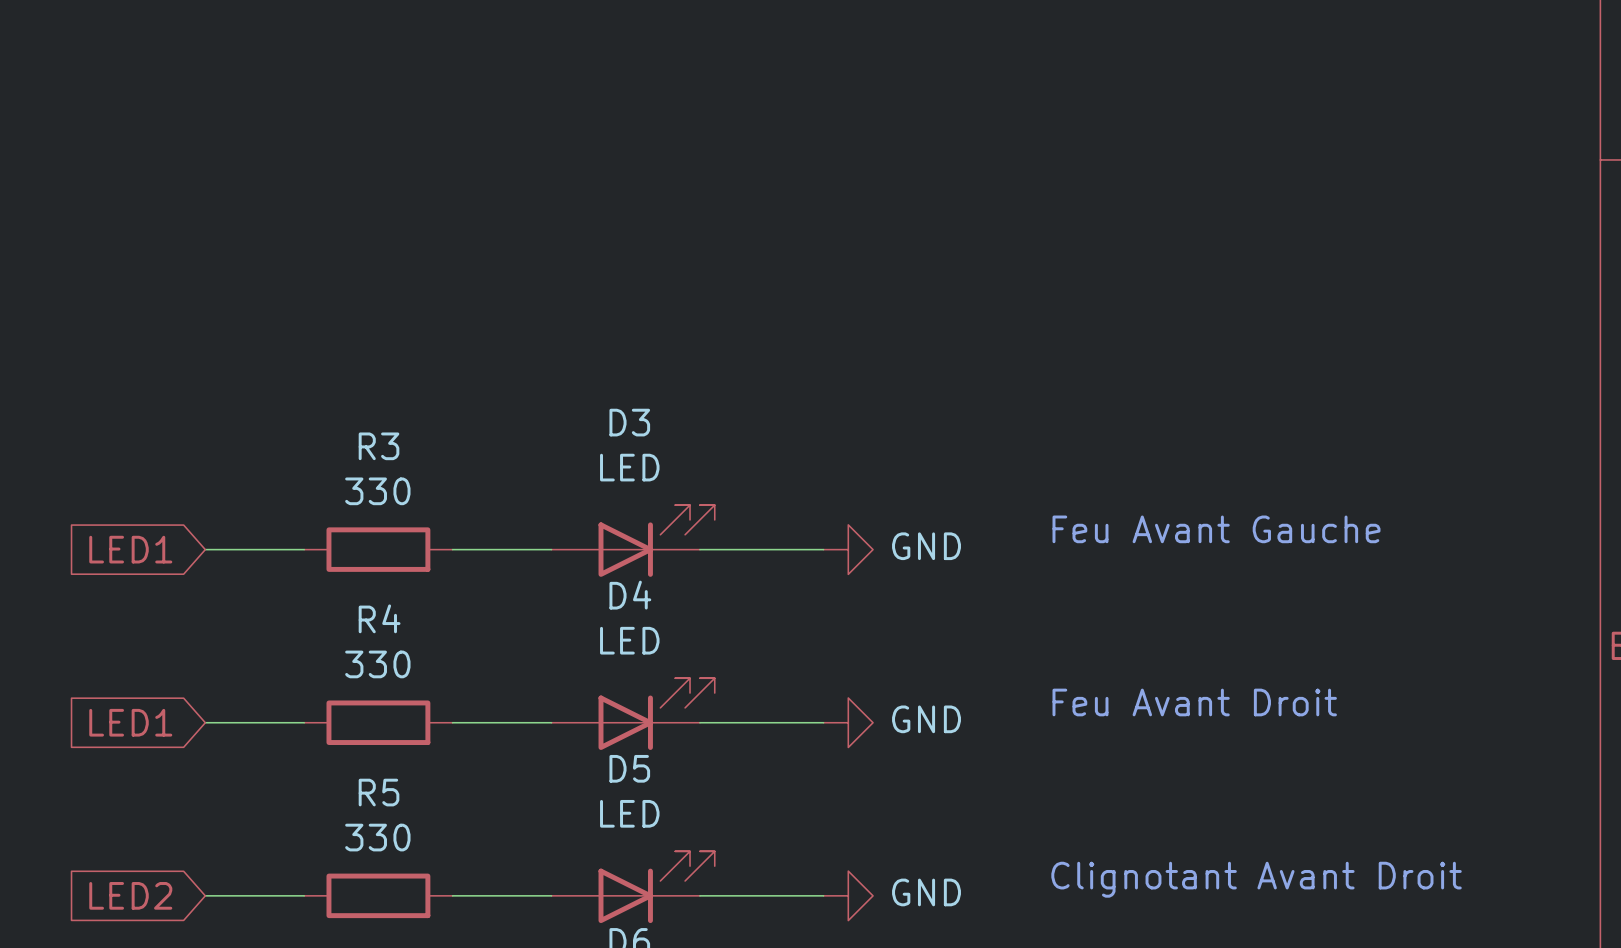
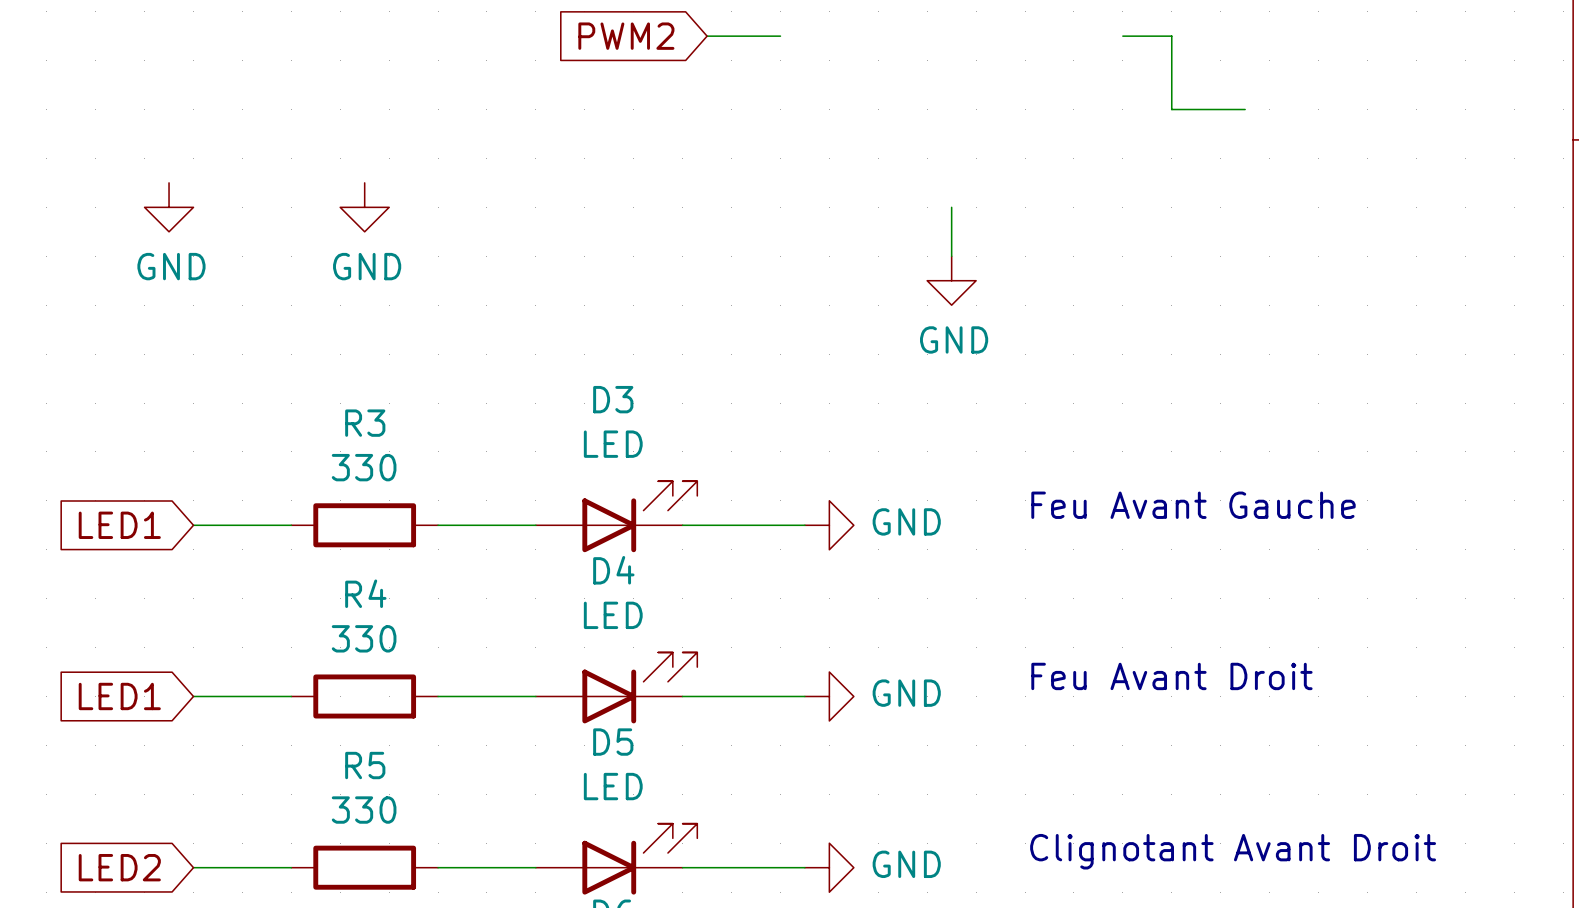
global label: none -> PWM2 (626, 36)
wire: none -> (707, 36) (780, 36)
wire: none -> (1122, 36) (1171, 36) (1171, 109) (1245, 109)
power symbol: none -> GND (169, 207)
power symbol: none -> GND (364, 207)
wire: none -> (951, 207) (951, 256)
power symbol: none -> GND (951, 280)

